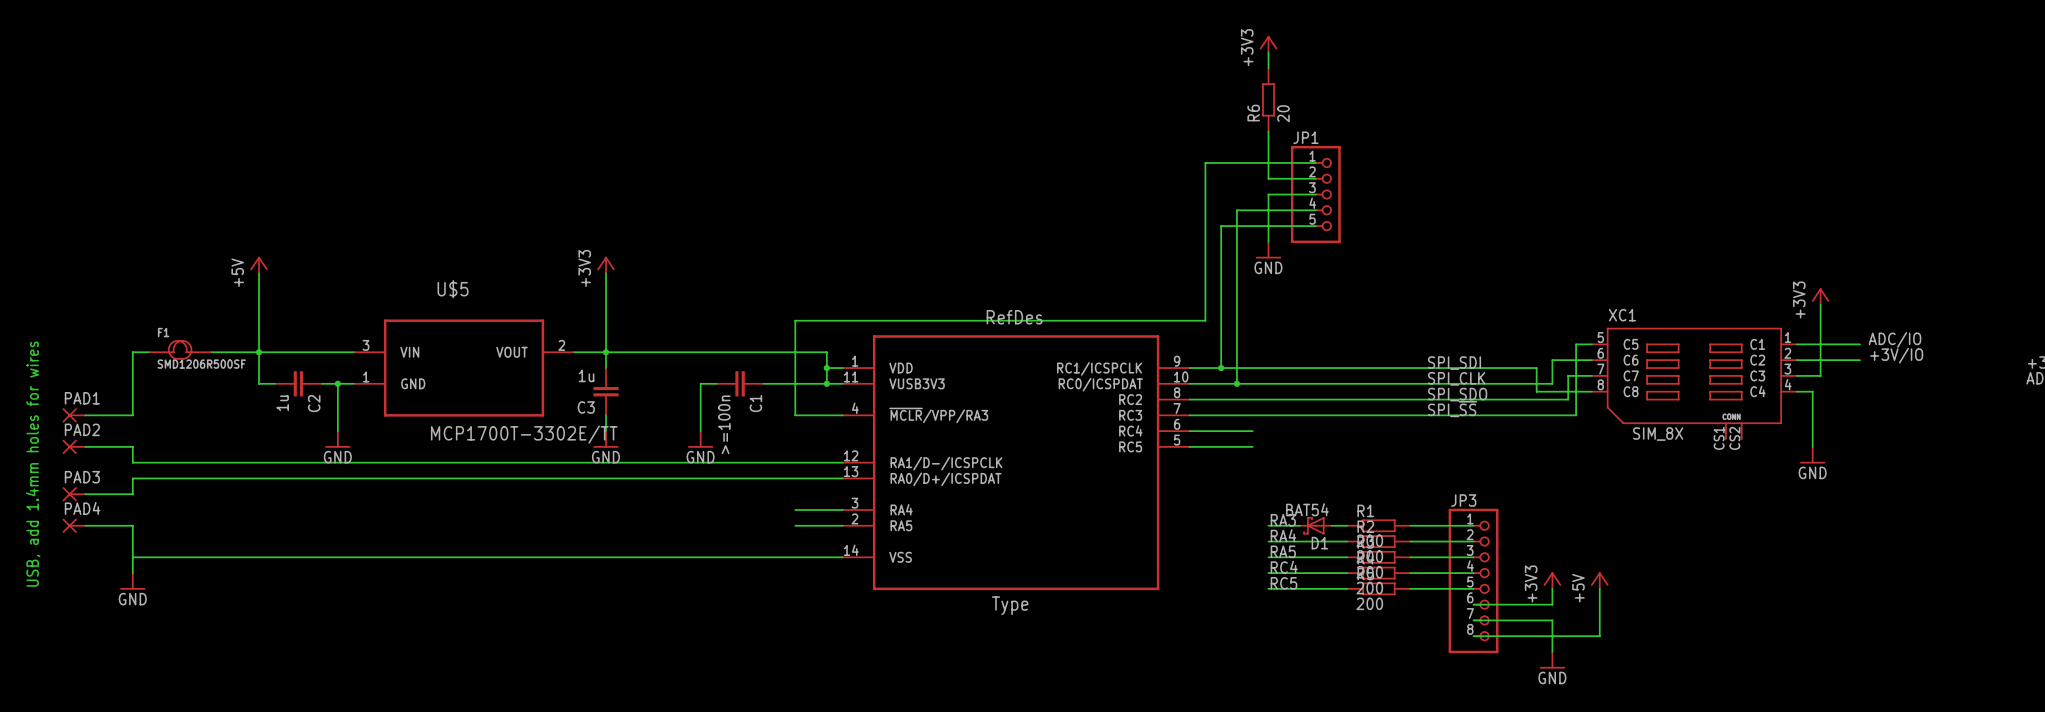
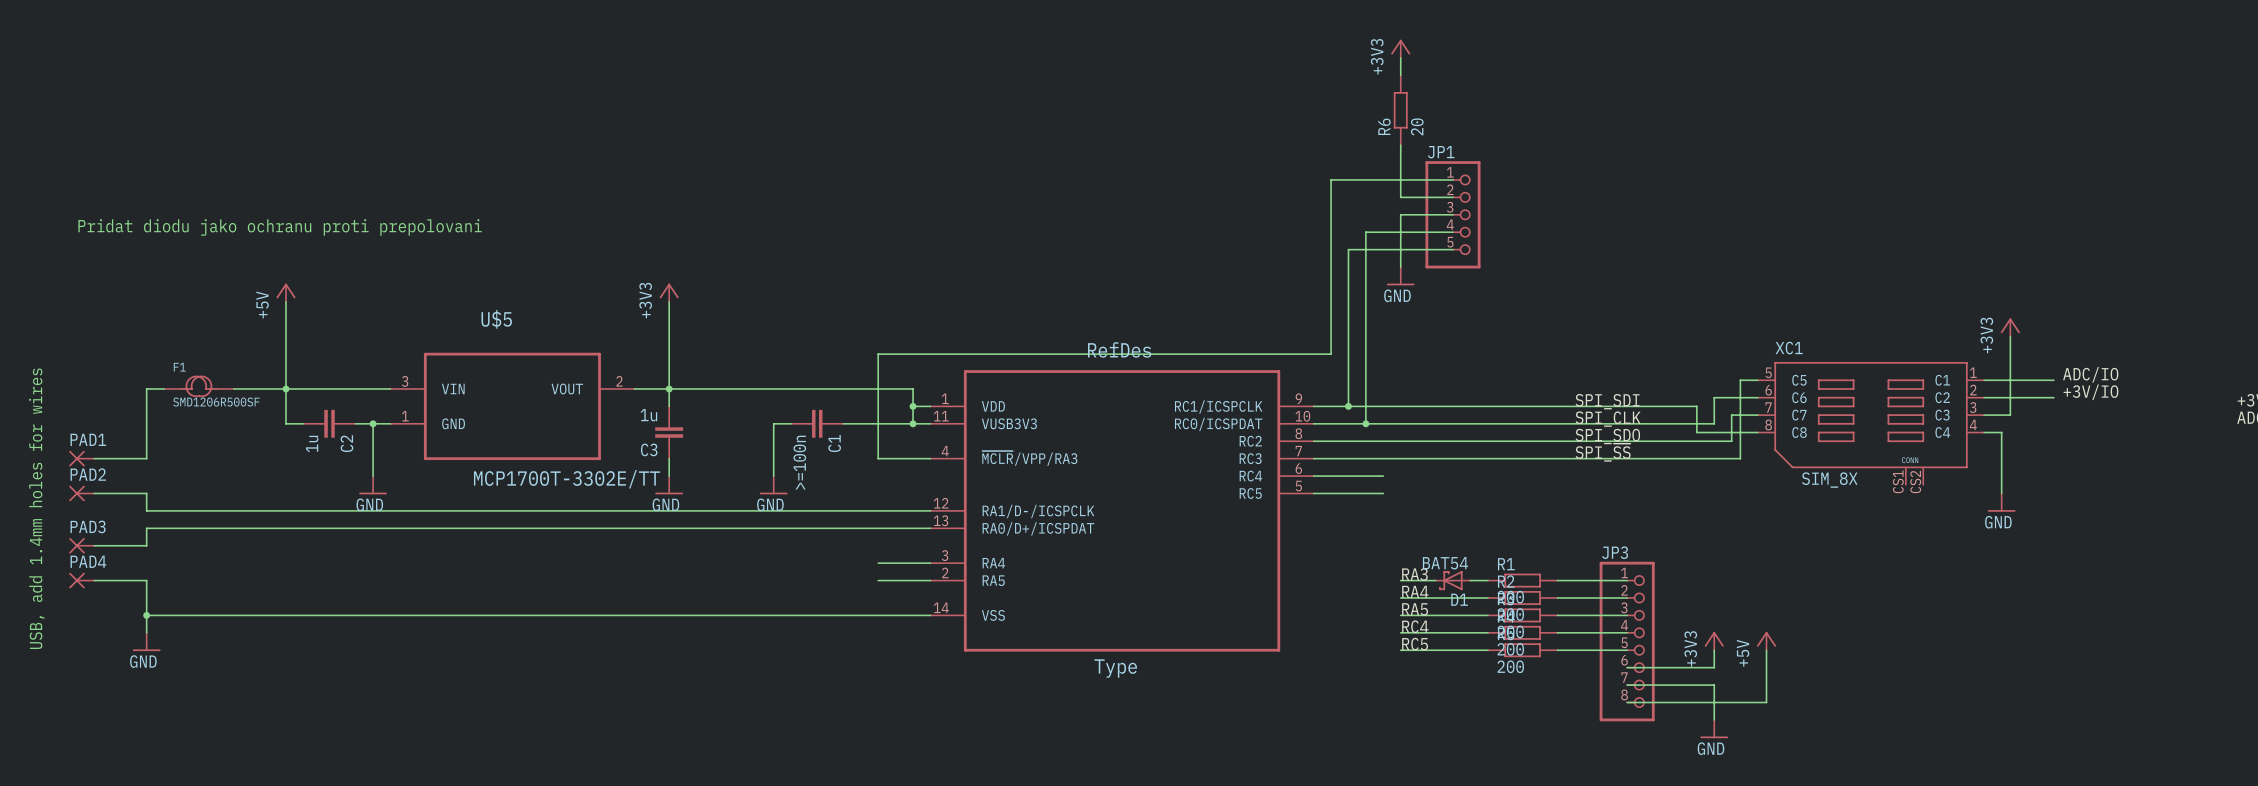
text: none -> Pridat diodu jako ochranu proti prepolovani (280, 227)
junction: none -> (146, 615)

